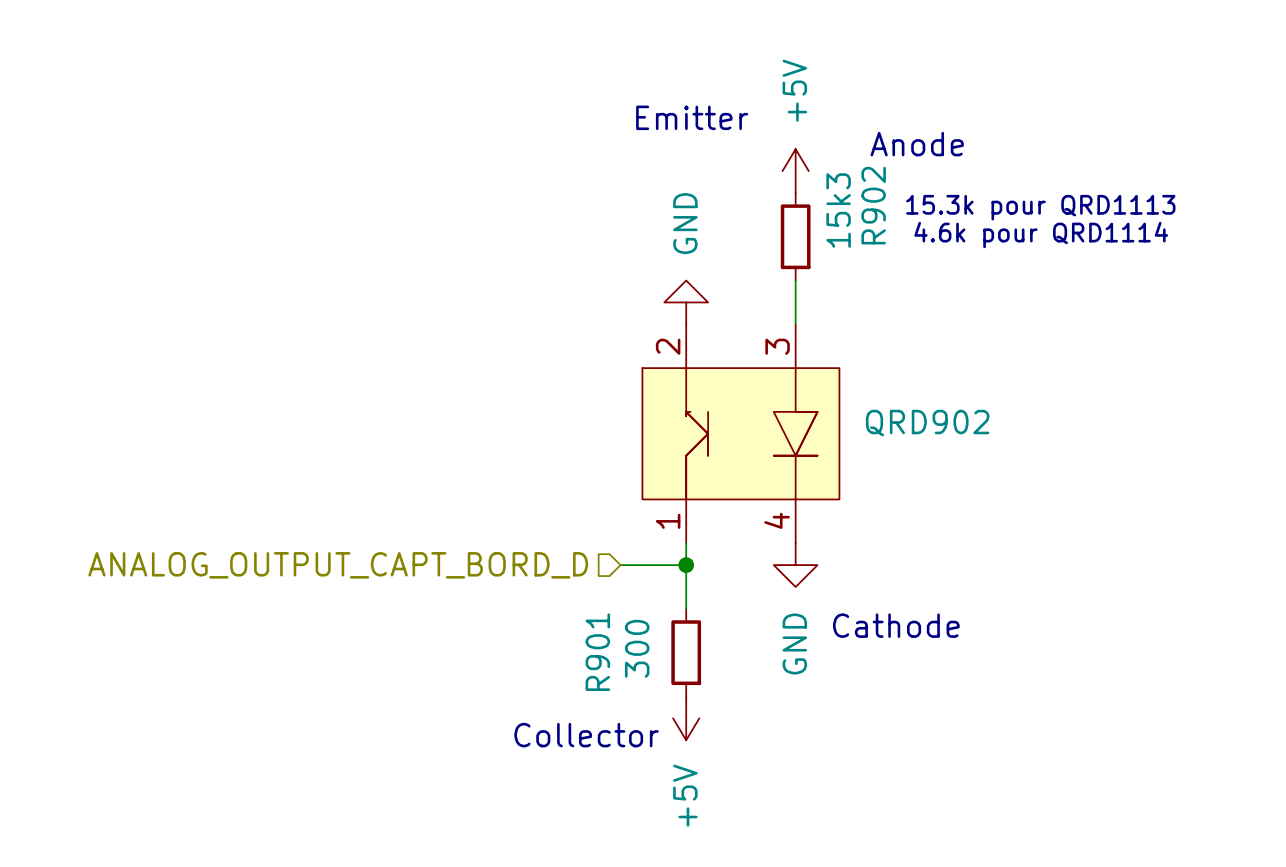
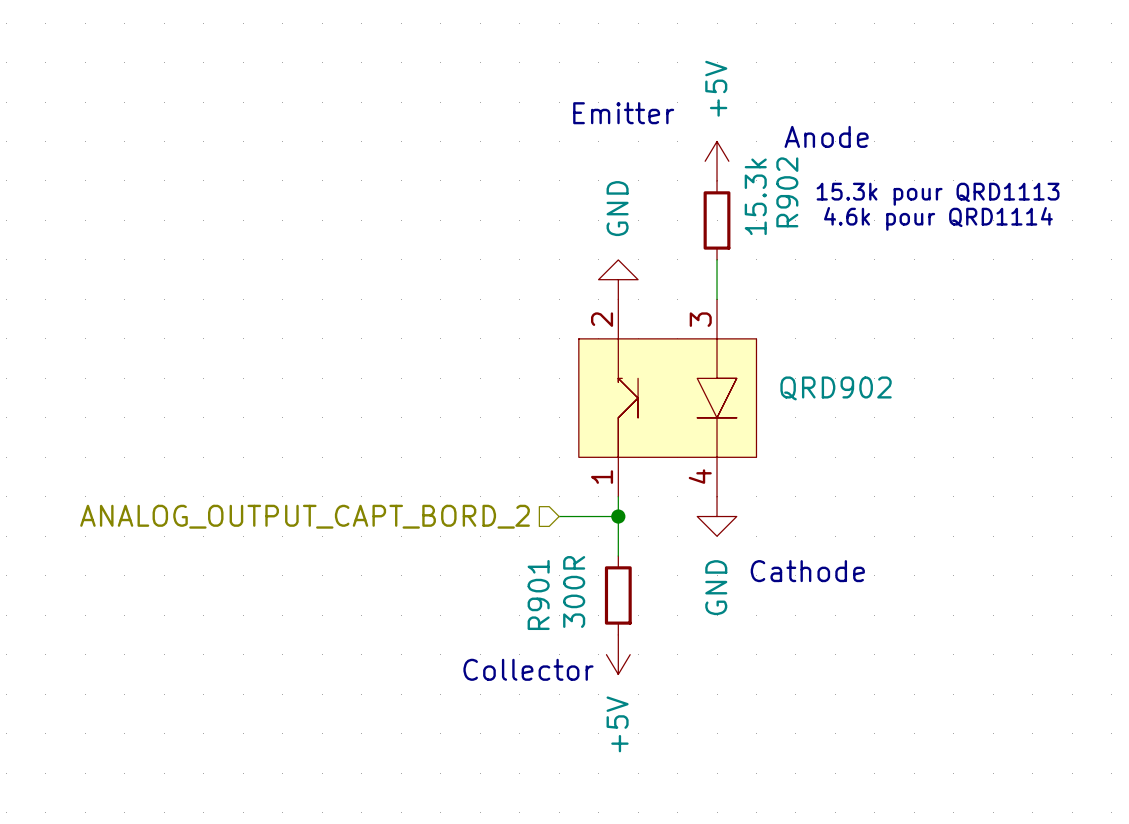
R902 value: 15k3 (838, 210) -> 15.3k (755, 196)
hierarchical label: ANALOG_OUTPUT_CAPT_BORD_D (338, 565) -> ANALOG_OUTPUT_CAPT_BORD_2 (305, 516)
R901 value: 300 (637, 648) -> 300R (574, 591)

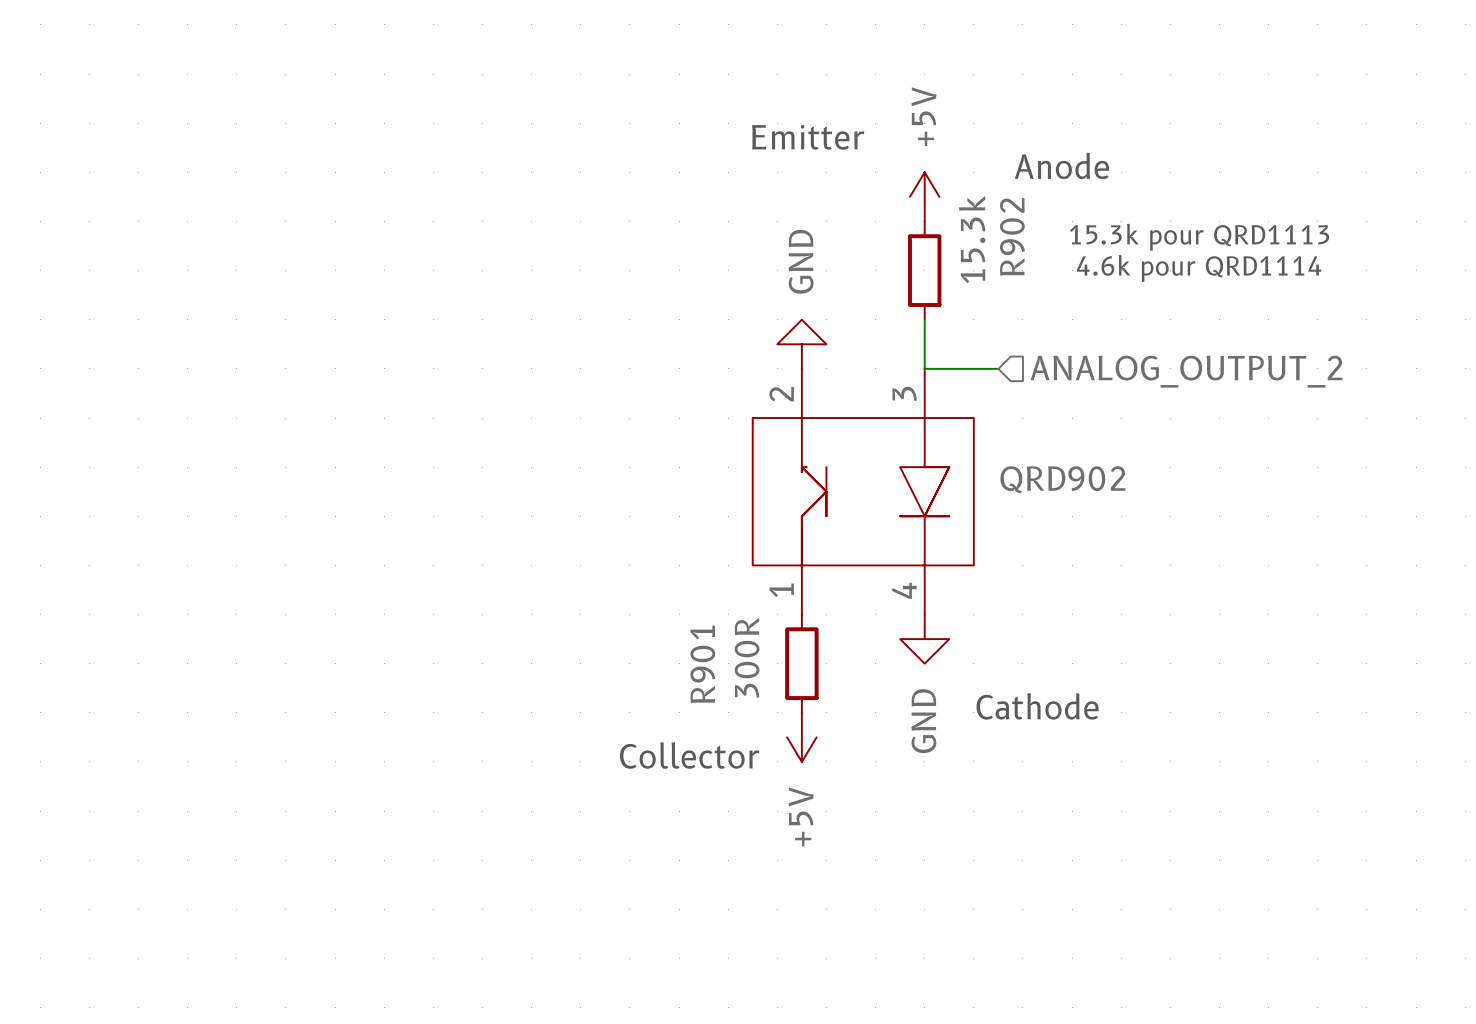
hierarchical label: none -> ANALOG_OUTPUT_2 (1186, 371)
wire: (618, 496) (618, 555) -> none
hierarchical label: ANALOG_OUTPUT_CAPT_BORD_2 (305, 516) -> none
wire: (559, 516) (618, 516) -> (924, 368) (998, 368)
junction: (618, 516) -> none
R901 position: (618, 595) -> (801, 663)
power symbol position: +5V (618, 654) -> +5V (801, 737)
text position: Collector (528, 669) -> Collector (689, 755)

